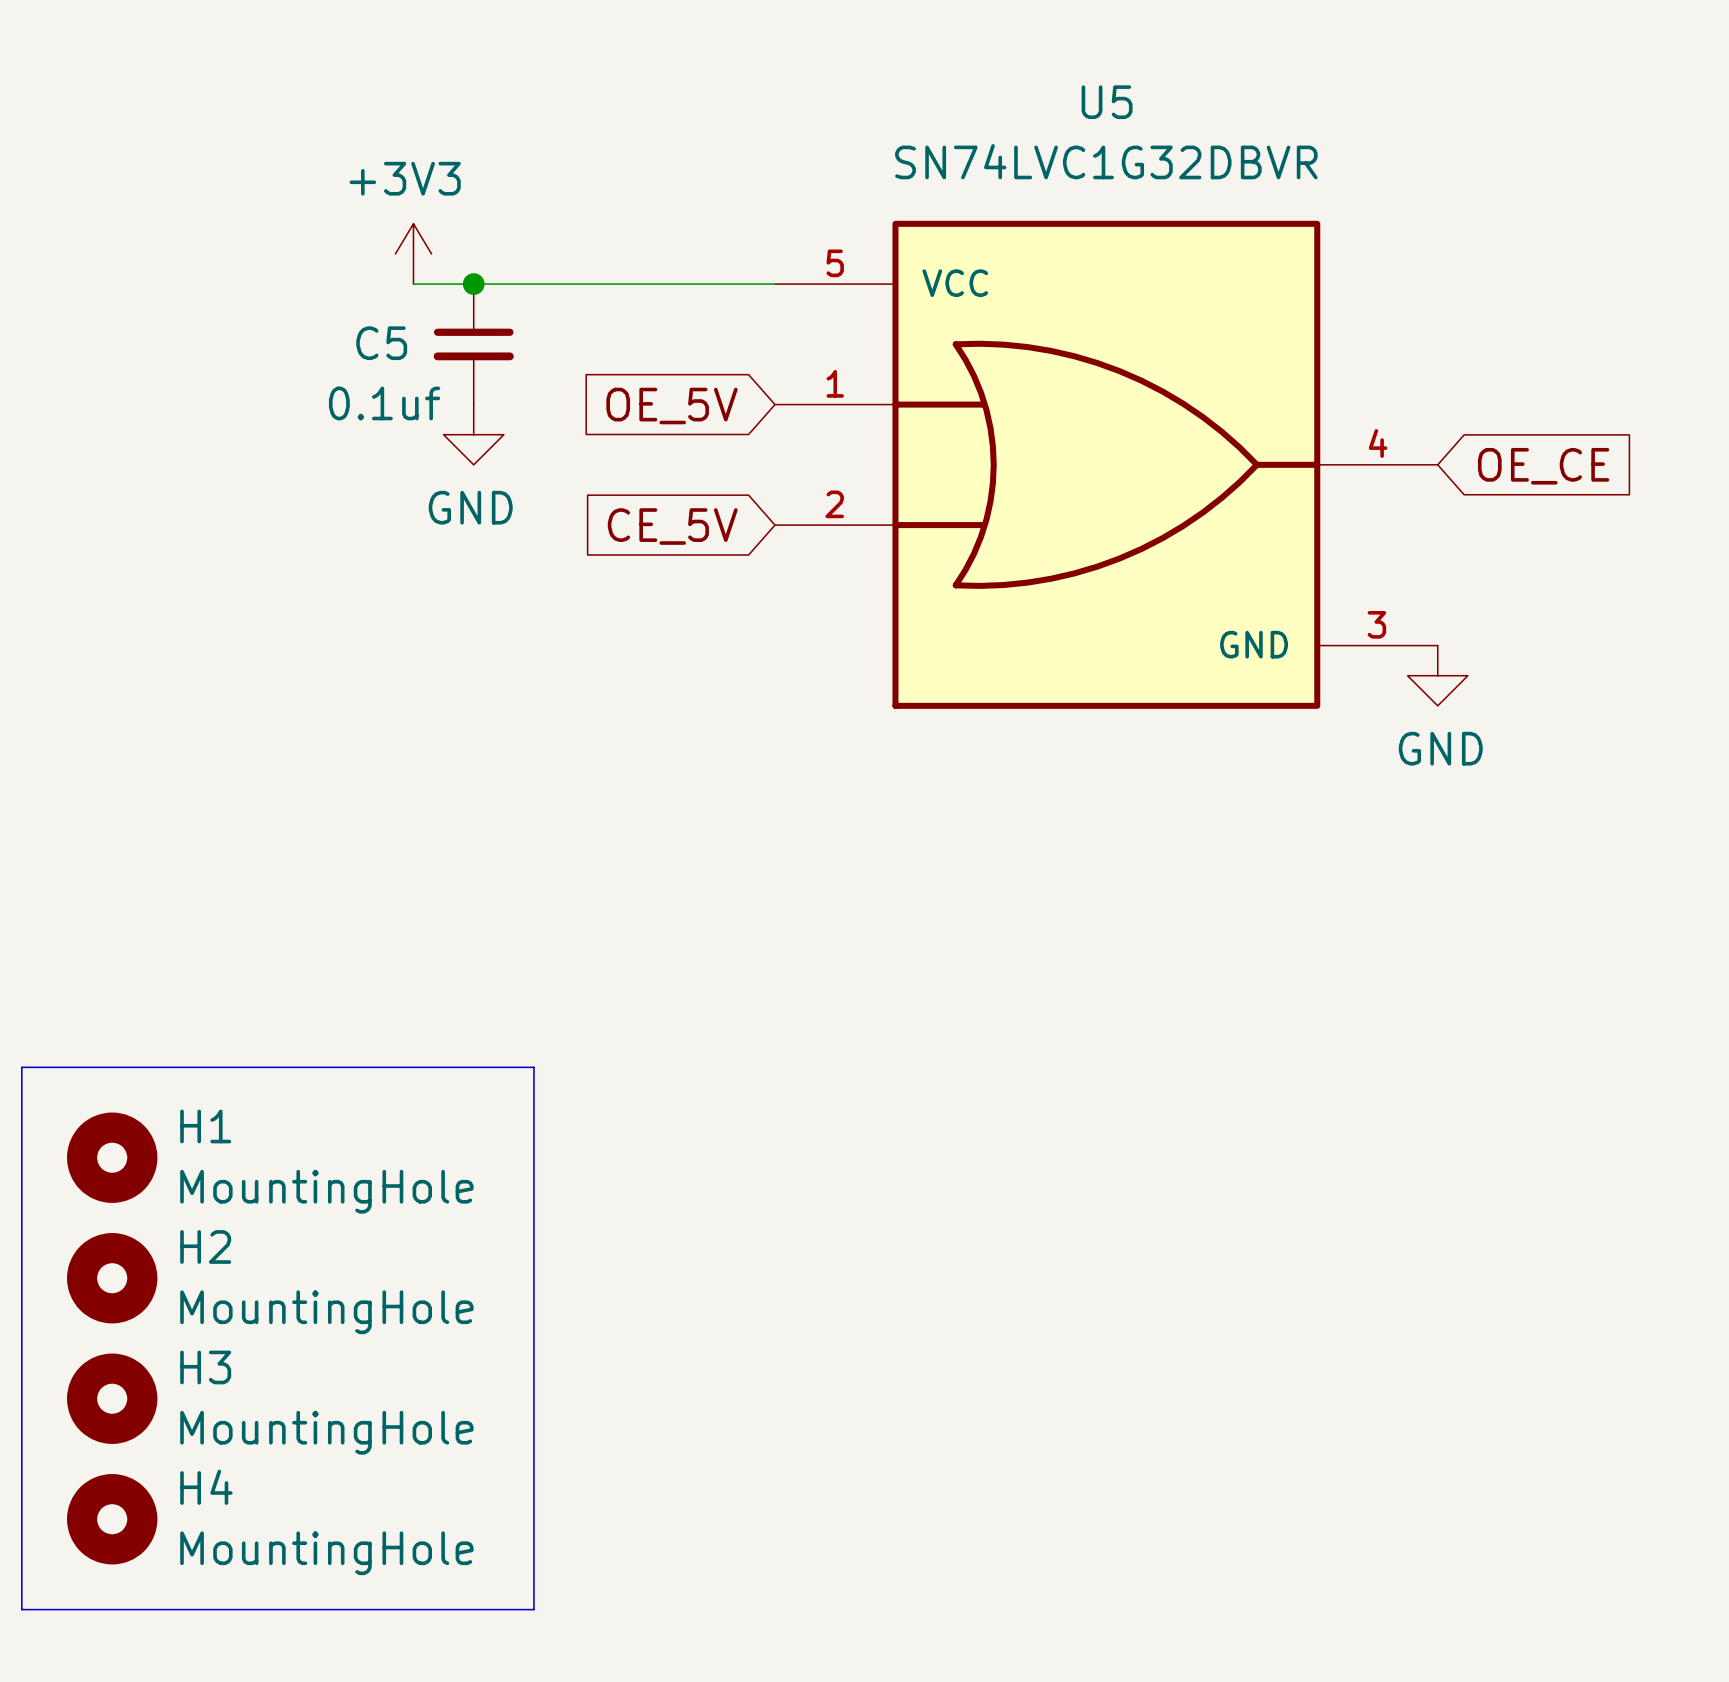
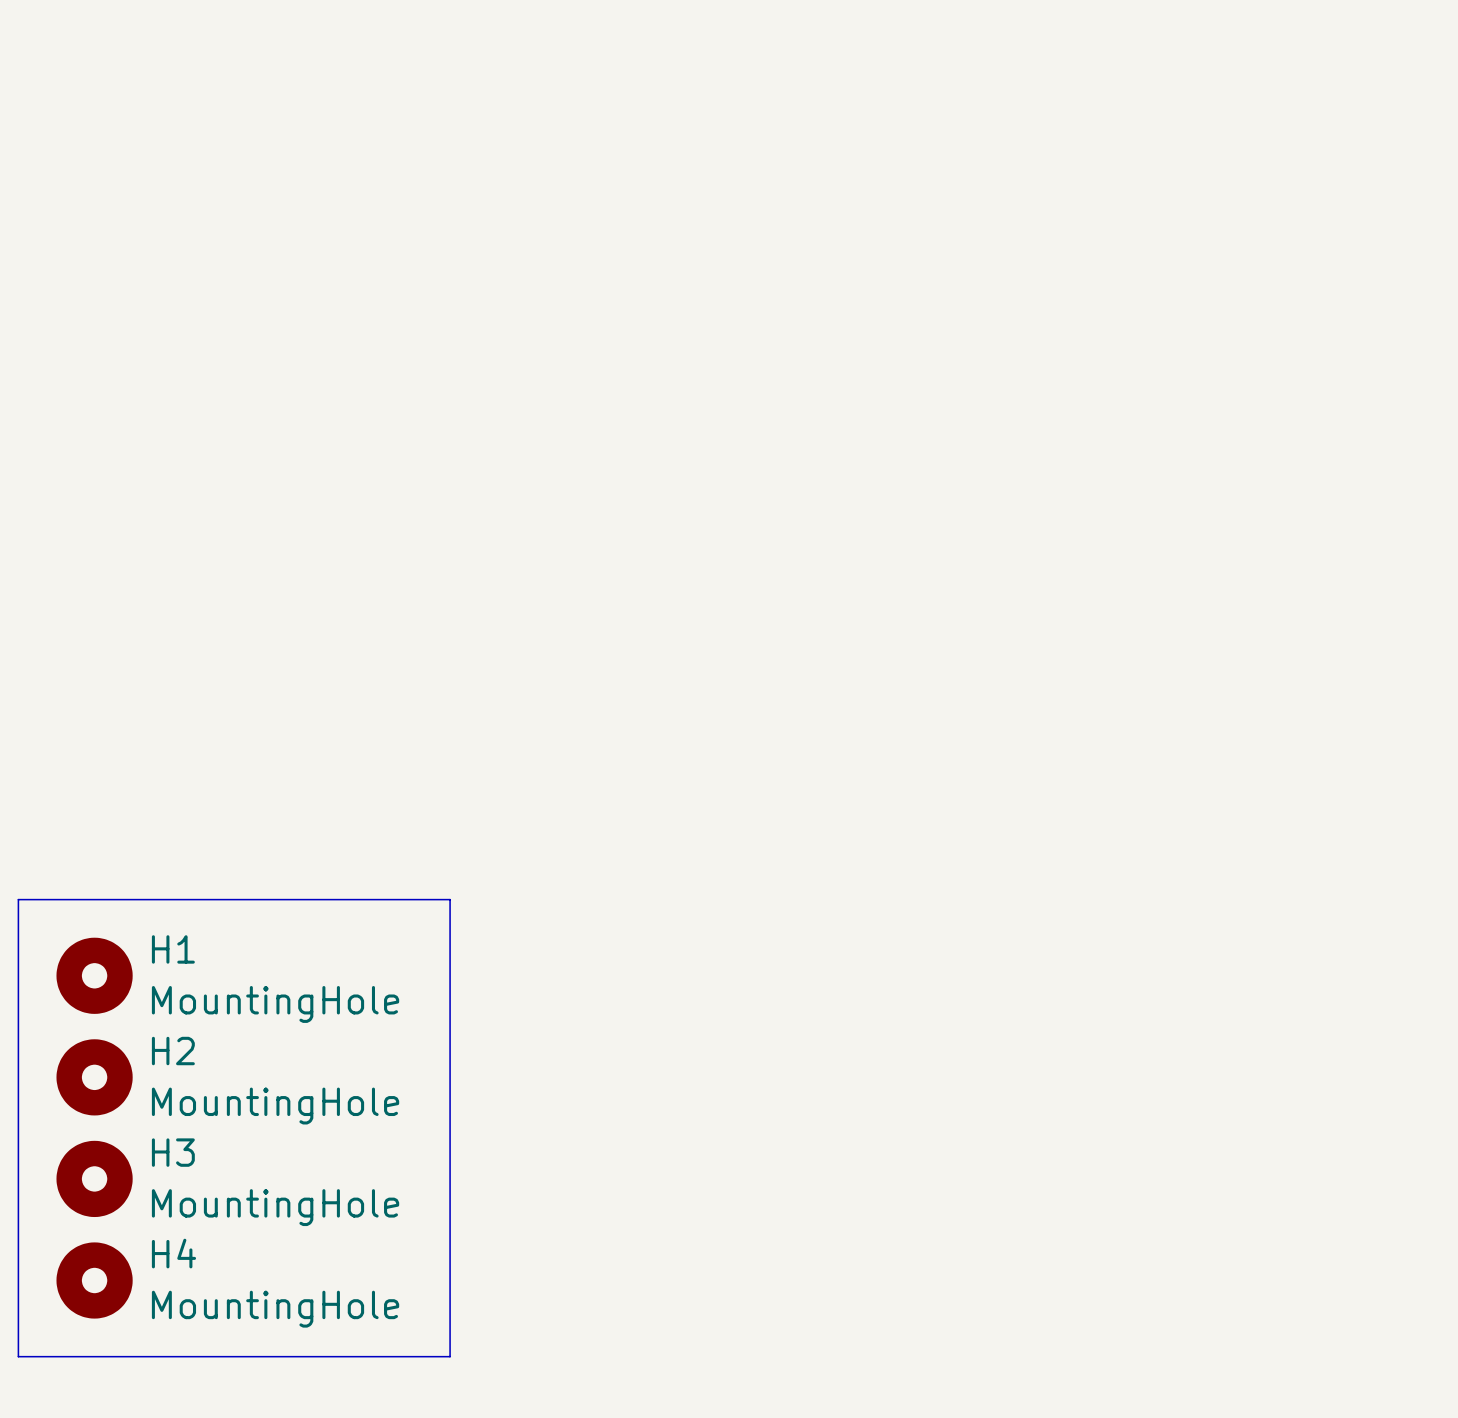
power symbol: +3V3 (413, 253) -> none
wire: (413, 284) (774, 284) -> none
junction: (473, 284) -> none
C5: 0.1uf (473, 344) -> none
global label: OE_5V (672, 406) -> none
power symbol: GND (473, 434) -> none
U5: SN74LVC1G32DBVR (1106, 464) -> none
global label: OE_CE (1543, 466) -> none
global label: CE_5V (672, 526) -> none
power symbol: GND (1437, 675) -> none

